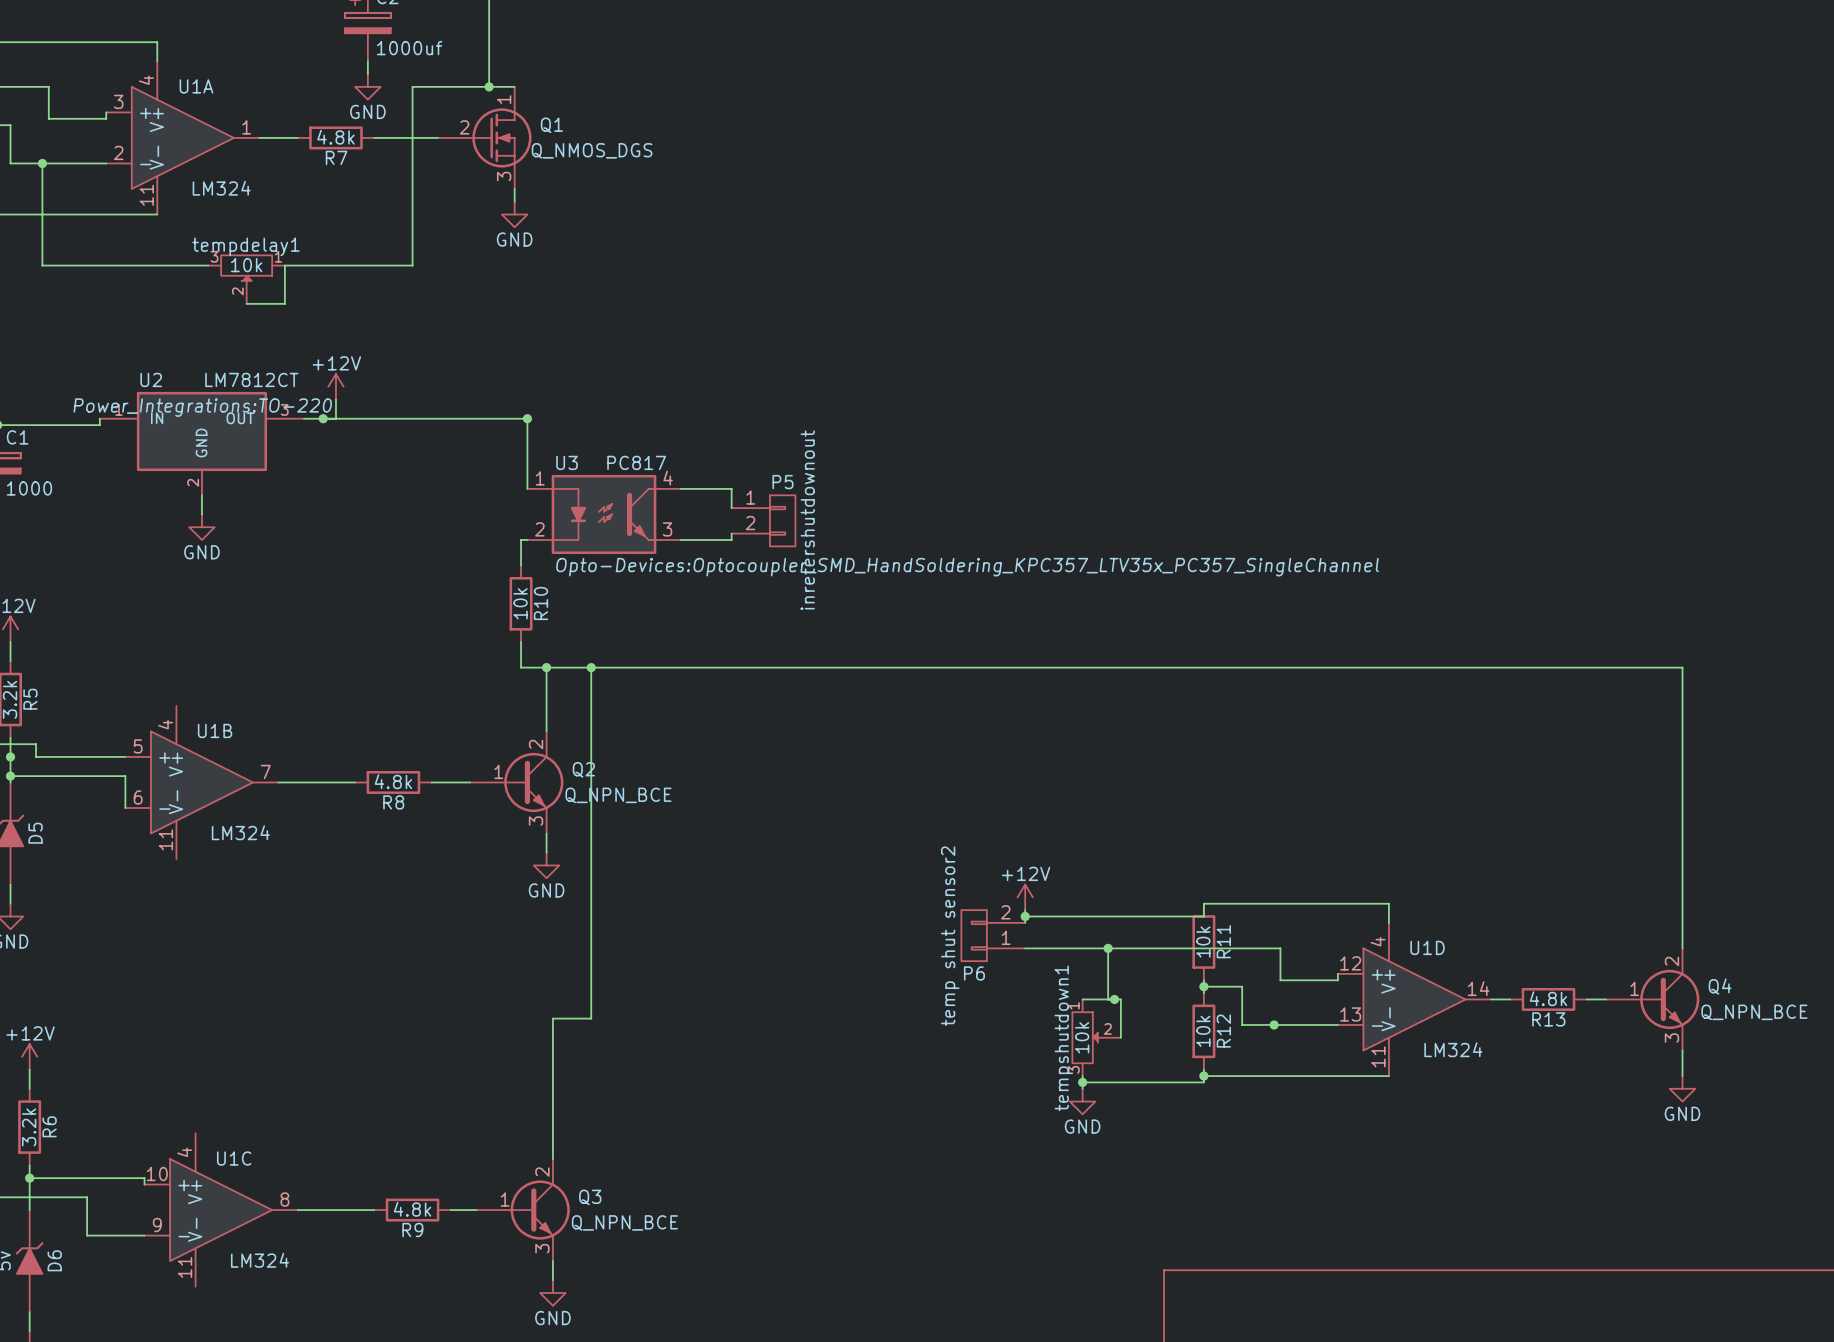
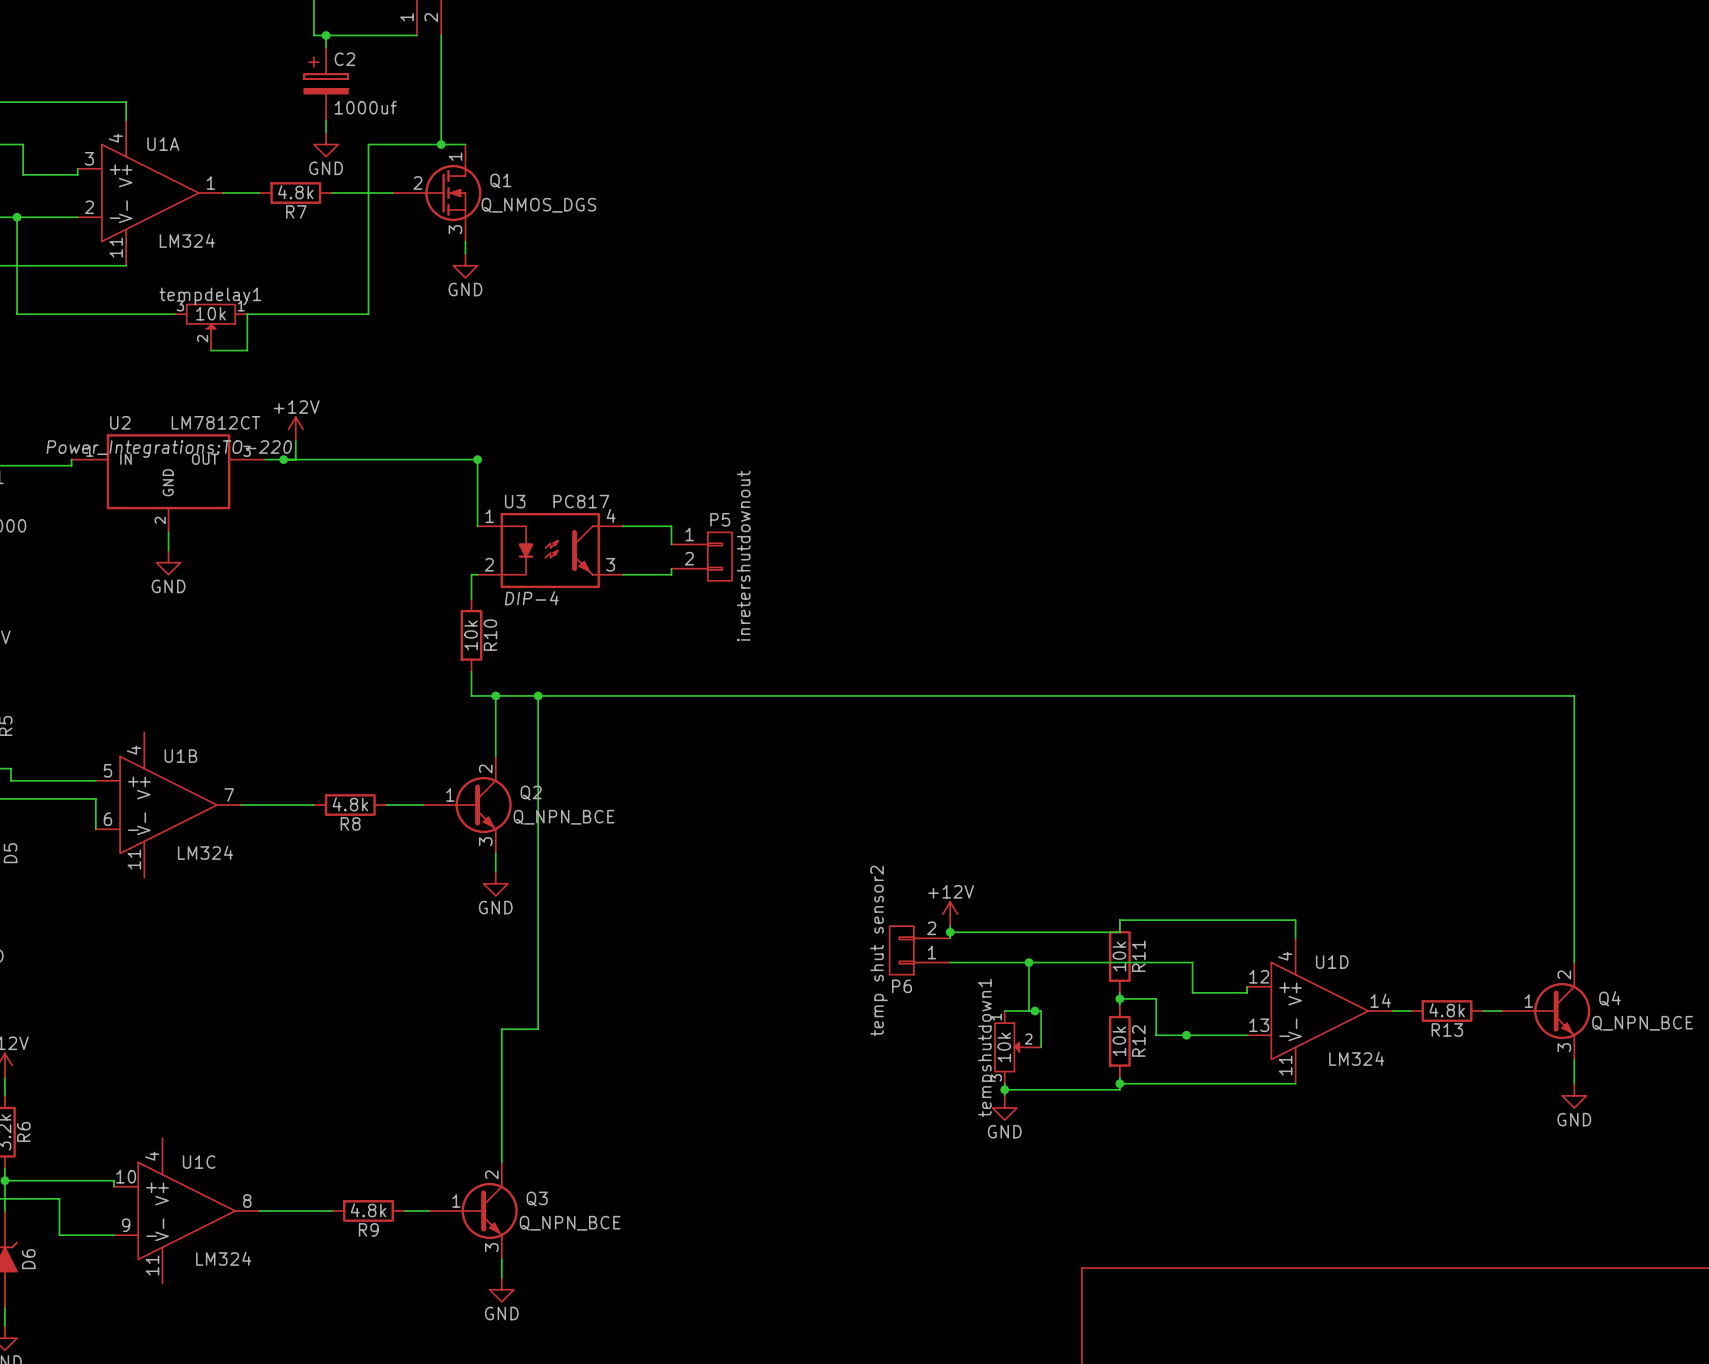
U3 text: Opto-Devices:Optocoupler_SMD_HandSoldering_KPC357_LTV35x_PC357_SingleChannel (967, 567) -> DIP-4 (531, 598)

